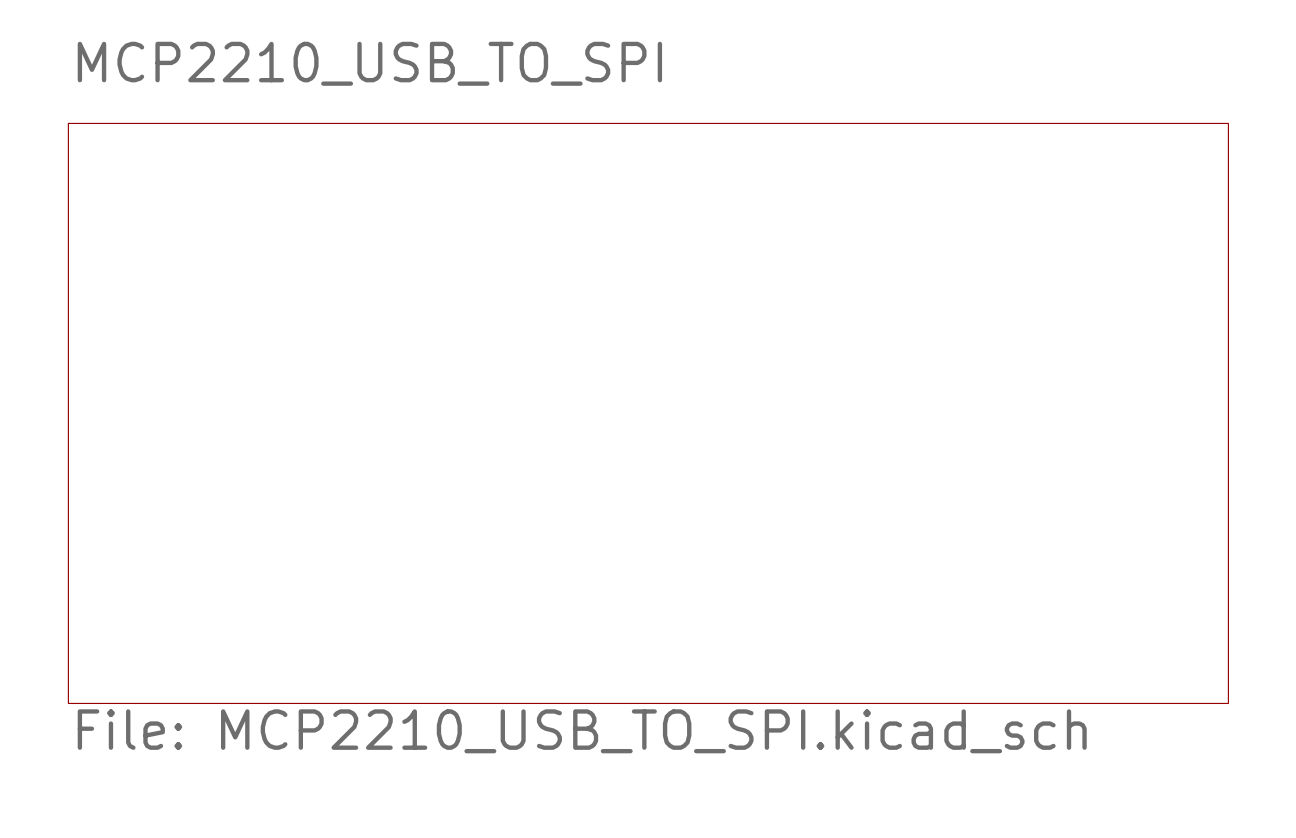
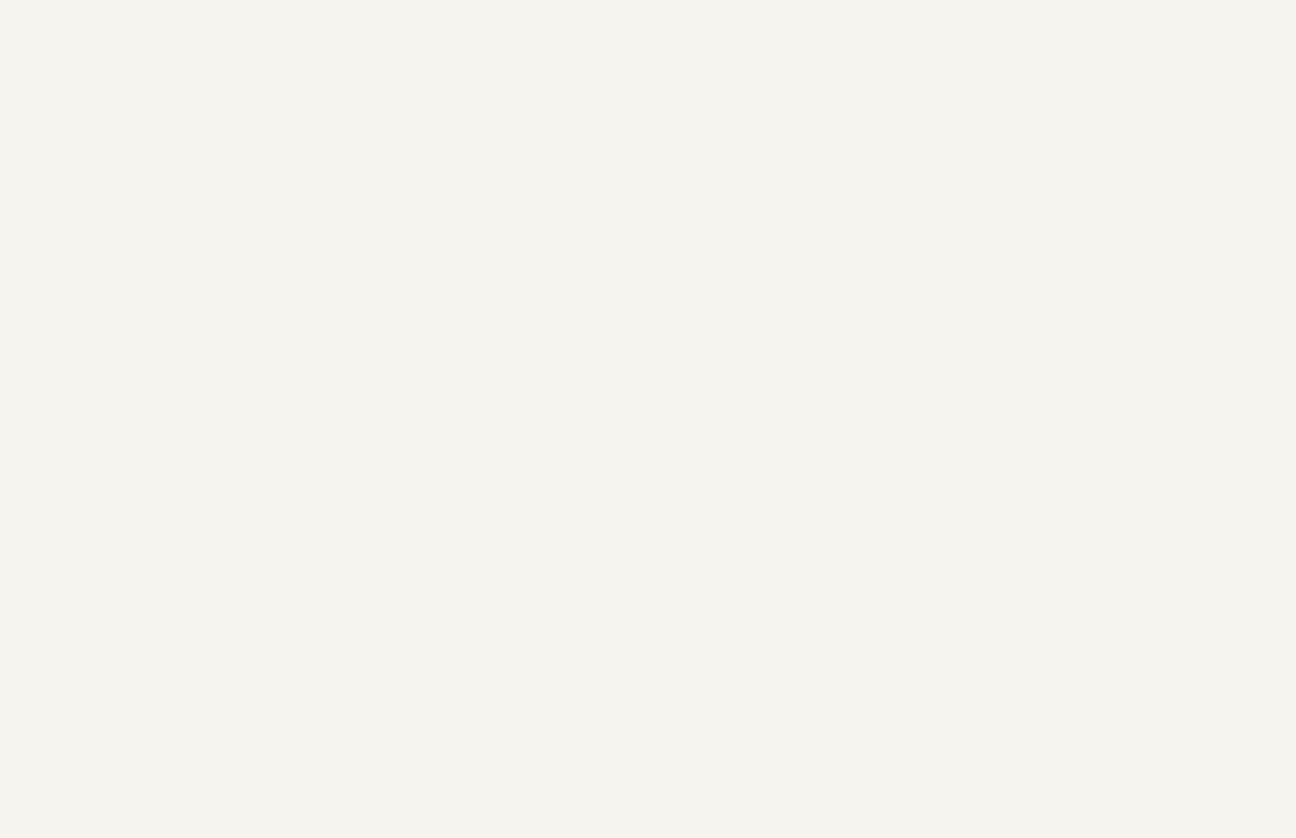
sheet MCP2210_USB_TO_SPI: File: MCP2210_USB_TO_SPI.kicad_sch (648, 413) -> none

